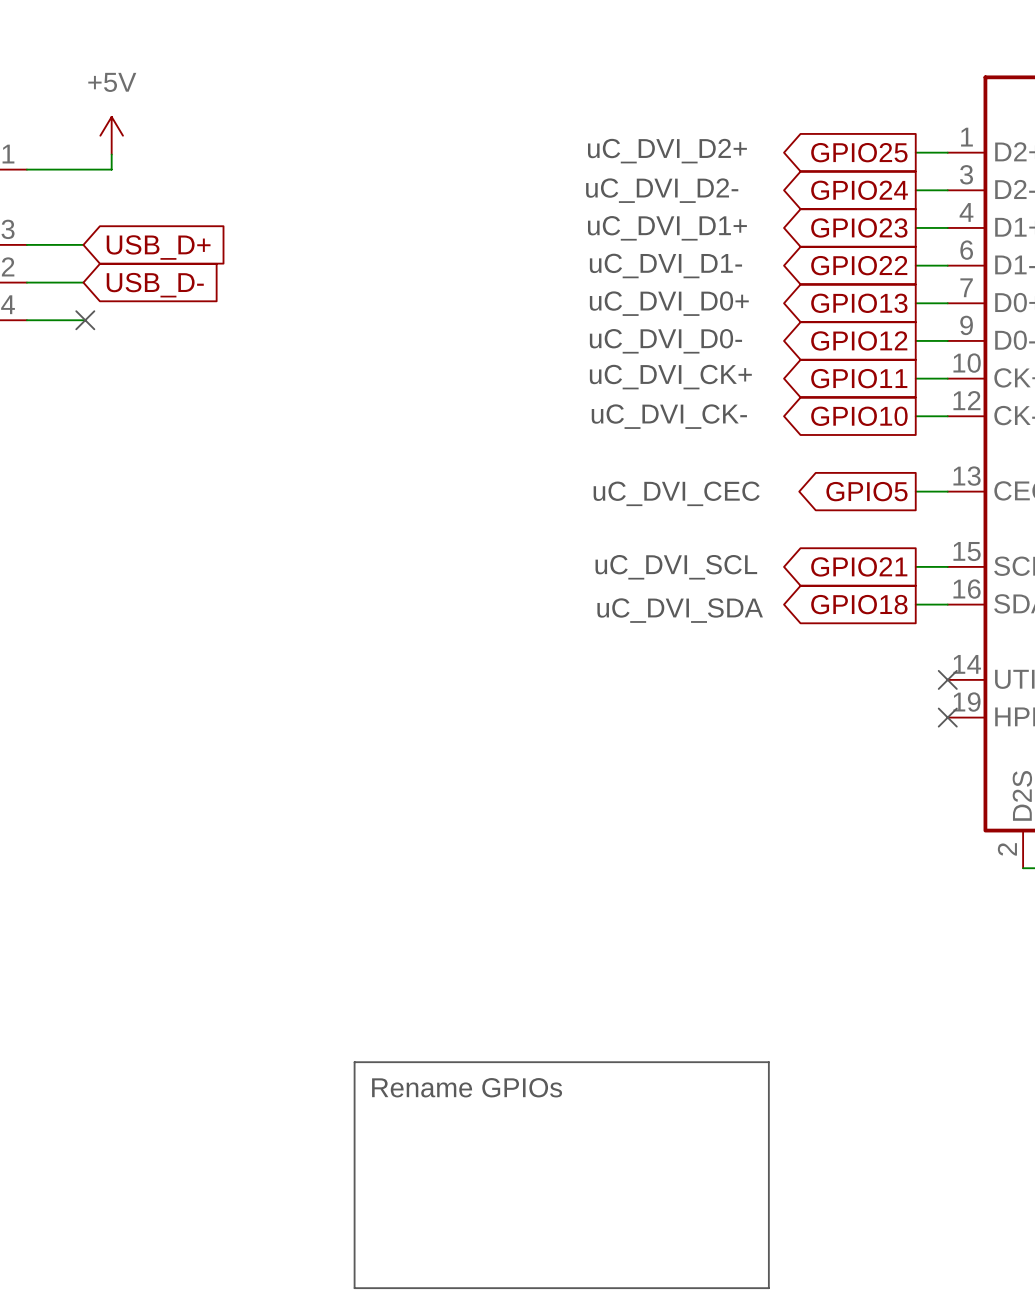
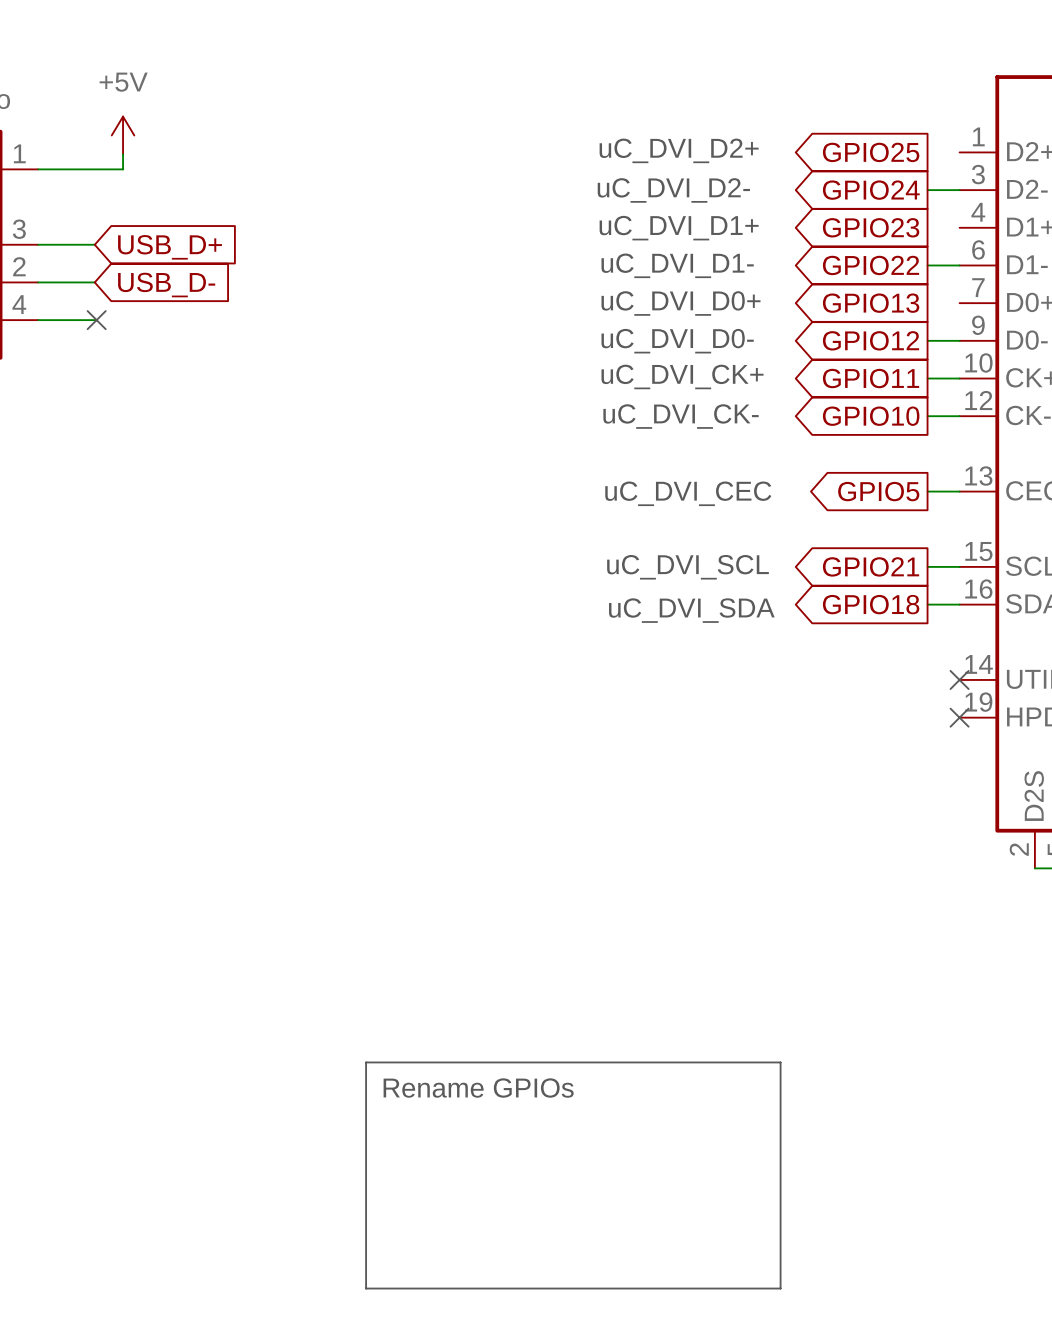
wire: (915, 152) (947, 152) -> none
wire: (915, 227) (947, 227) -> none
wire: (915, 303) (947, 303) -> none

